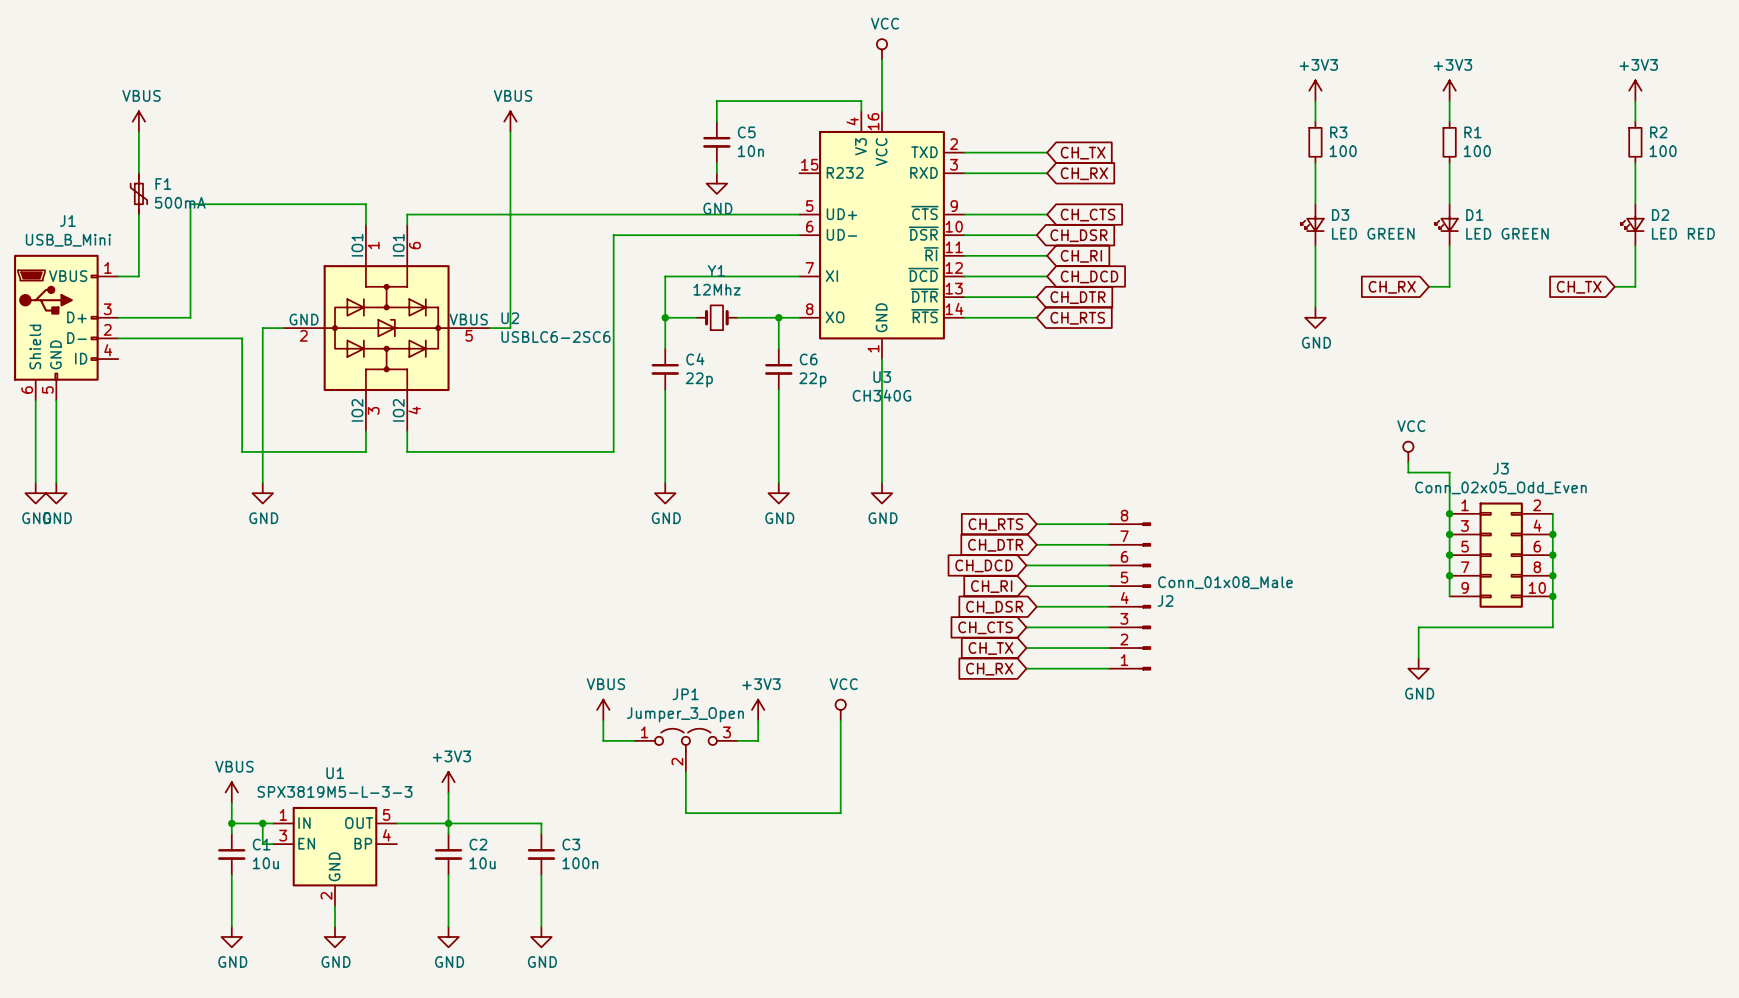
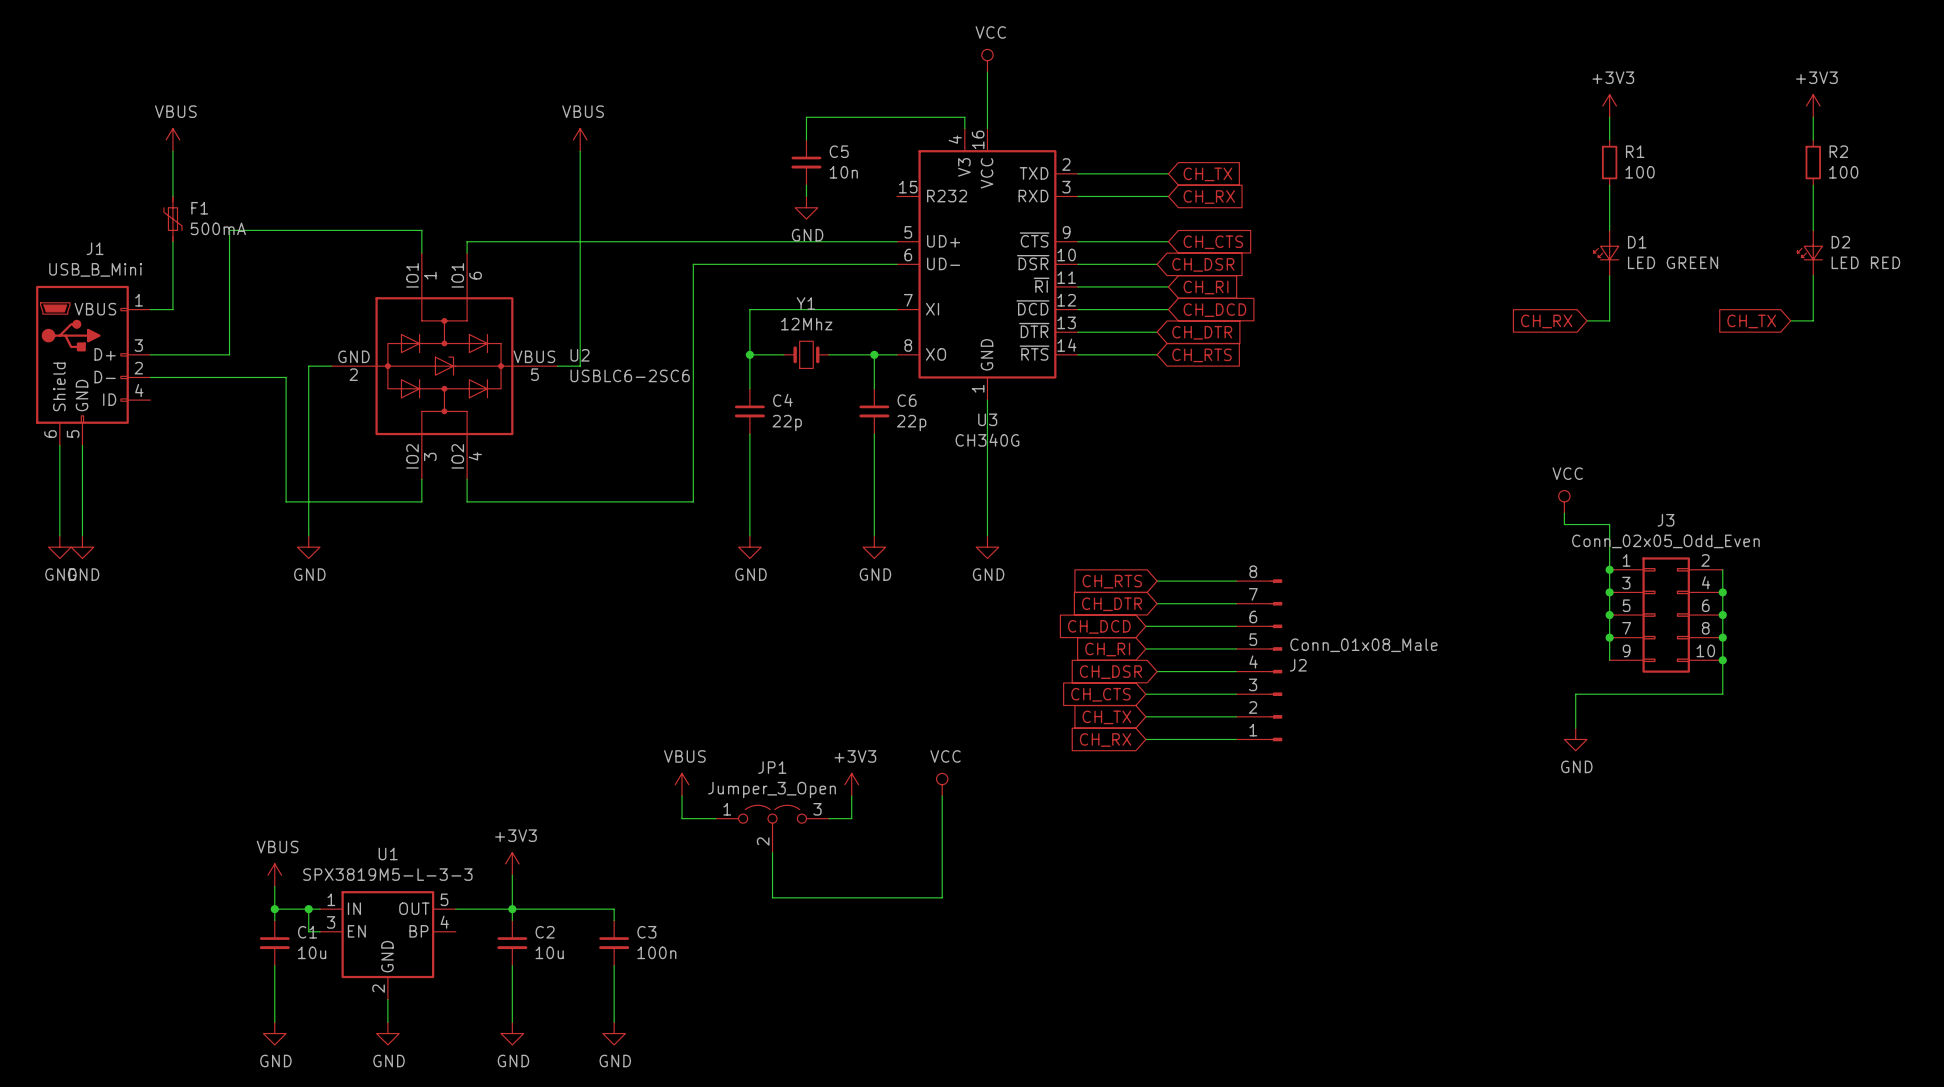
power symbol: +3V3 (1315, 90) -> none
wire: (1315, 101) (1315, 121) -> none
R3: 100 (1315, 142) -> none
wire: (1315, 162) (1315, 204) -> none
D3: LED GREEN (1312, 224) -> none
wire: (1315, 245) (1315, 307) -> none
power symbol: GND (1315, 317) -> none

